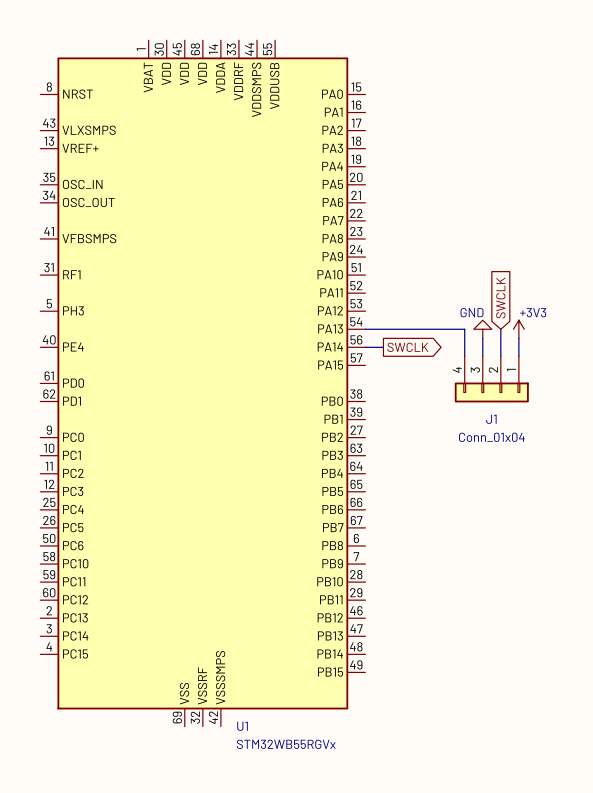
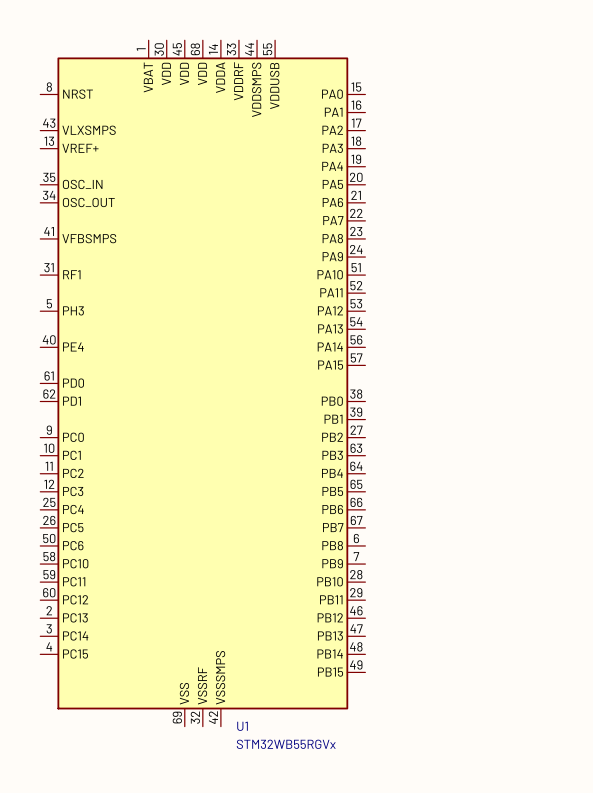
global label: SWCLK (500, 297) -> none
wire: (365, 329) (464, 329) (464, 356) -> none
power symbol: GND (482, 329) -> none
wire: (500, 329) (500, 356) -> none
power symbol: +3V3 (518, 329) -> none
wire: (482, 338) (482, 356) -> none
wire: (518, 338) (518, 356) -> none
wire: (365, 347) (383, 347) -> none
global label: SWCLK (407, 347) -> none
J1: Conn_01x04 (491, 379) -> none

